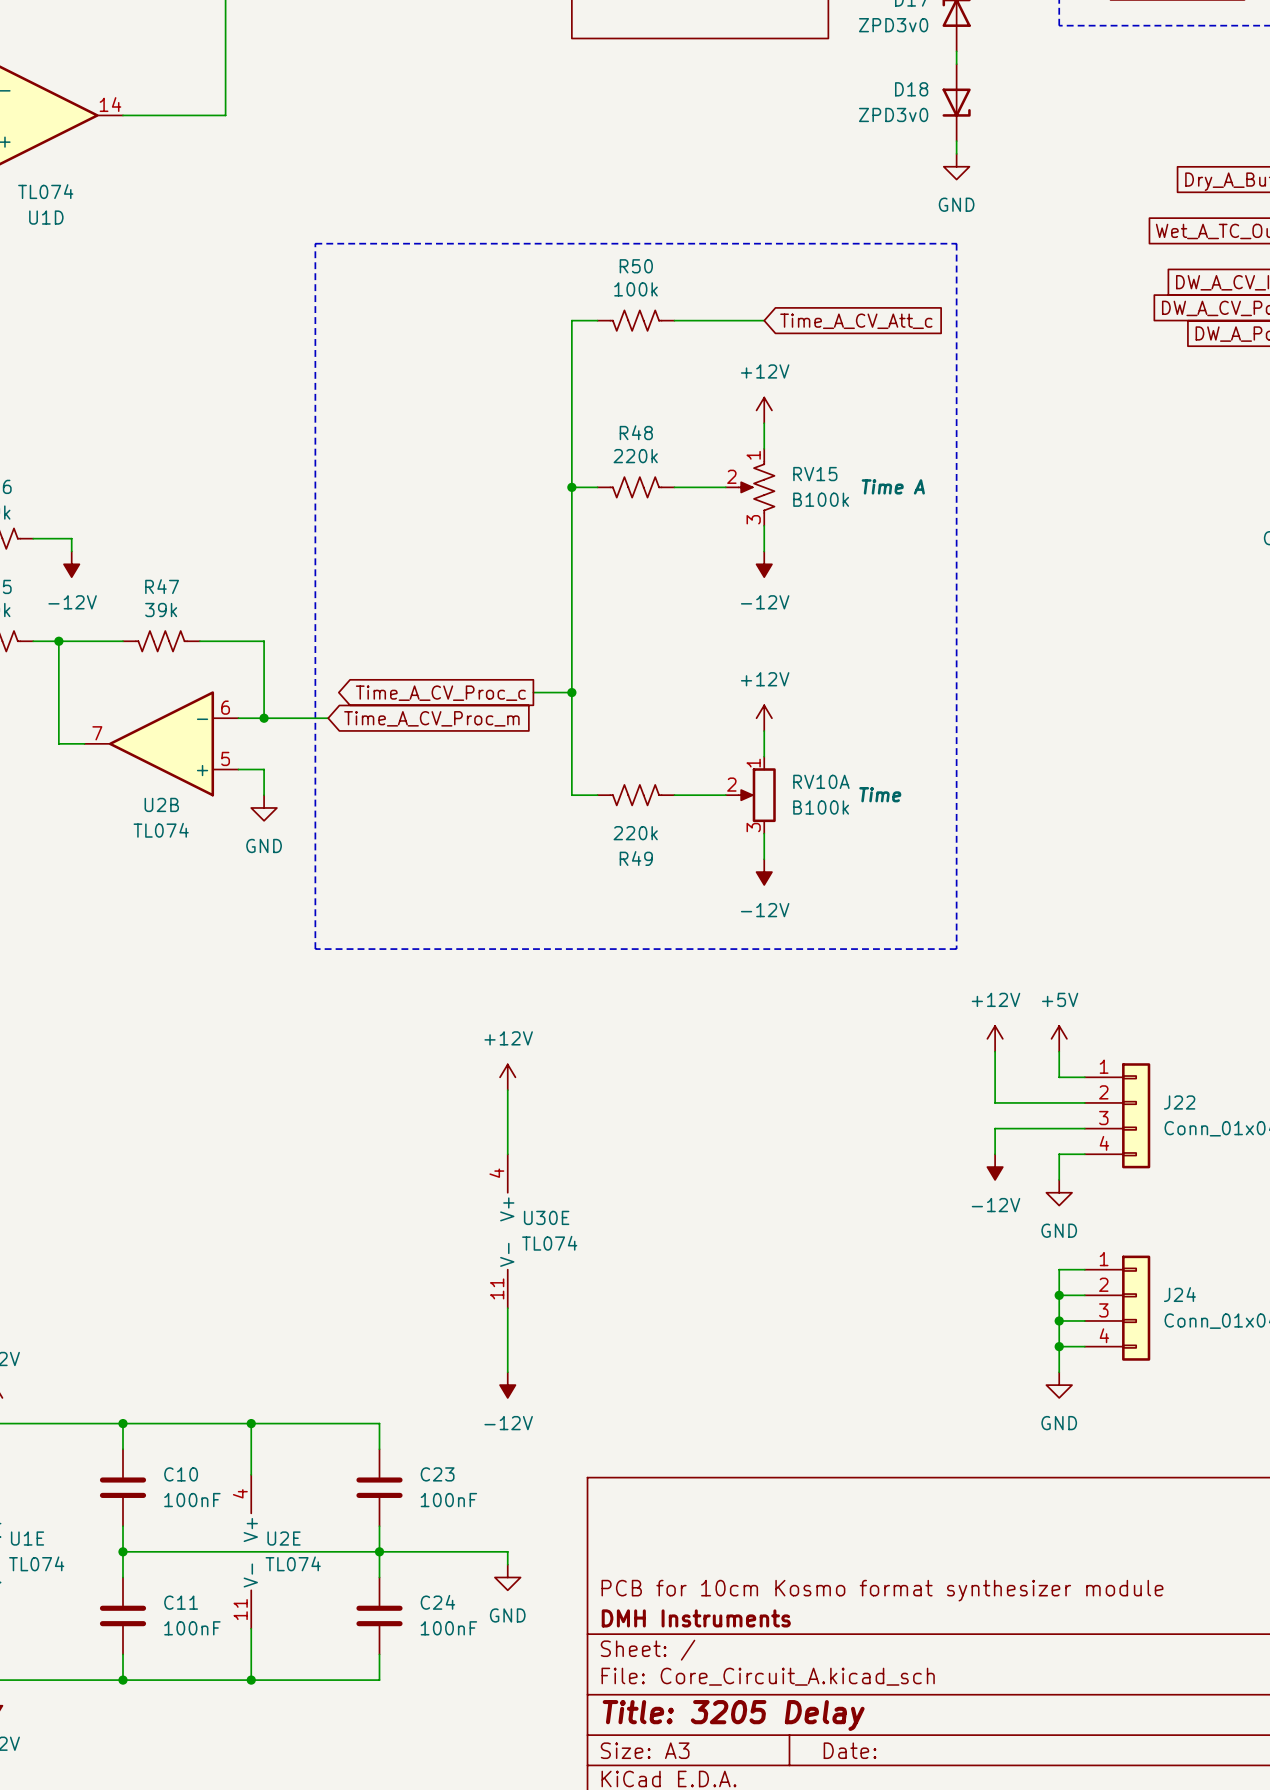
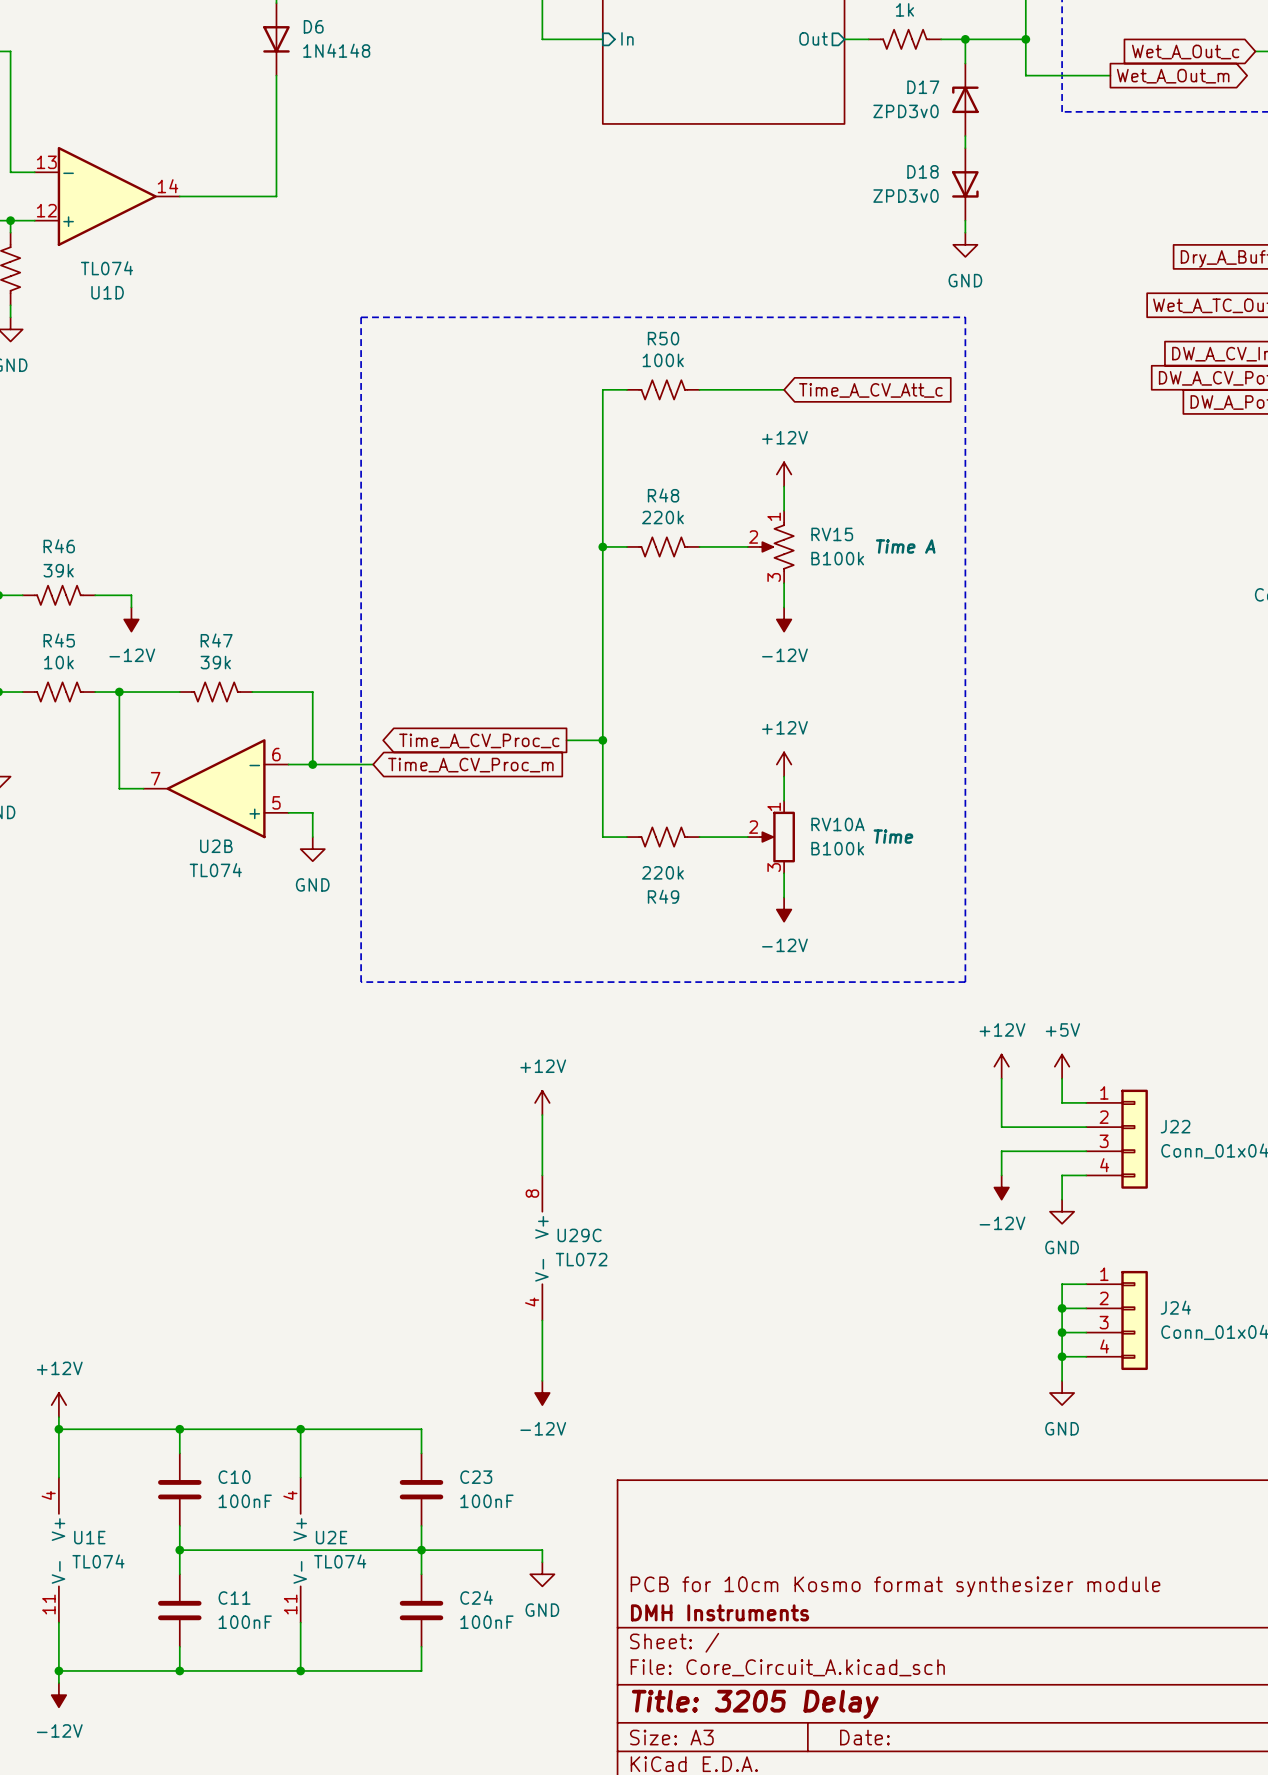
U30E pin number: 4 (496, 1173) -> 8 (532, 1193)
U30E name: U30E (546, 1217) -> U29C (579, 1235)
U30E value: TL074 (549, 1243) -> TL072 (581, 1259)
U30E pin number: 11 (497, 1288) -> 4 (532, 1302)

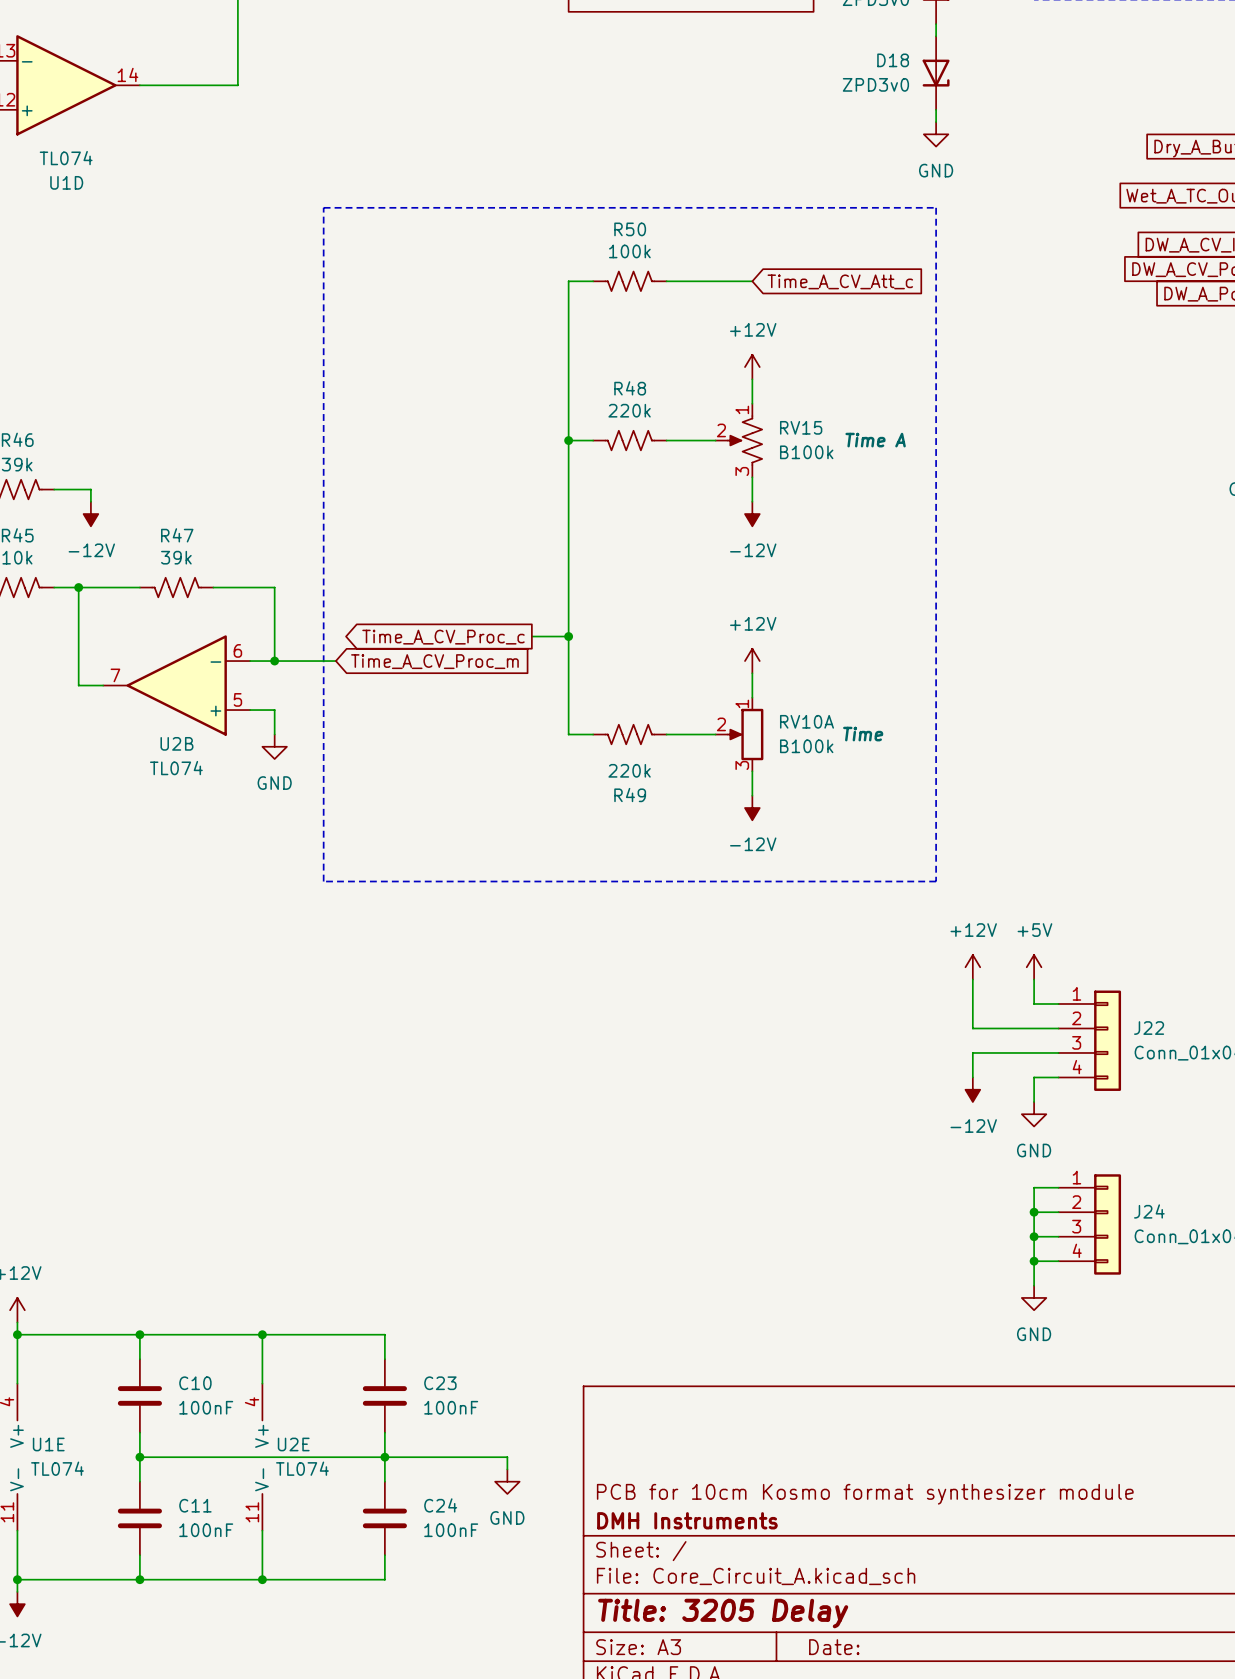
power symbol: +12V (542, 1102) -> none
wire: (542, 1115) (542, 1175) -> none
U29C: TL072 (542, 1247) -> none
wire: (542, 1320) (542, 1380) -> none
power symbol: -12V (542, 1393) -> none

